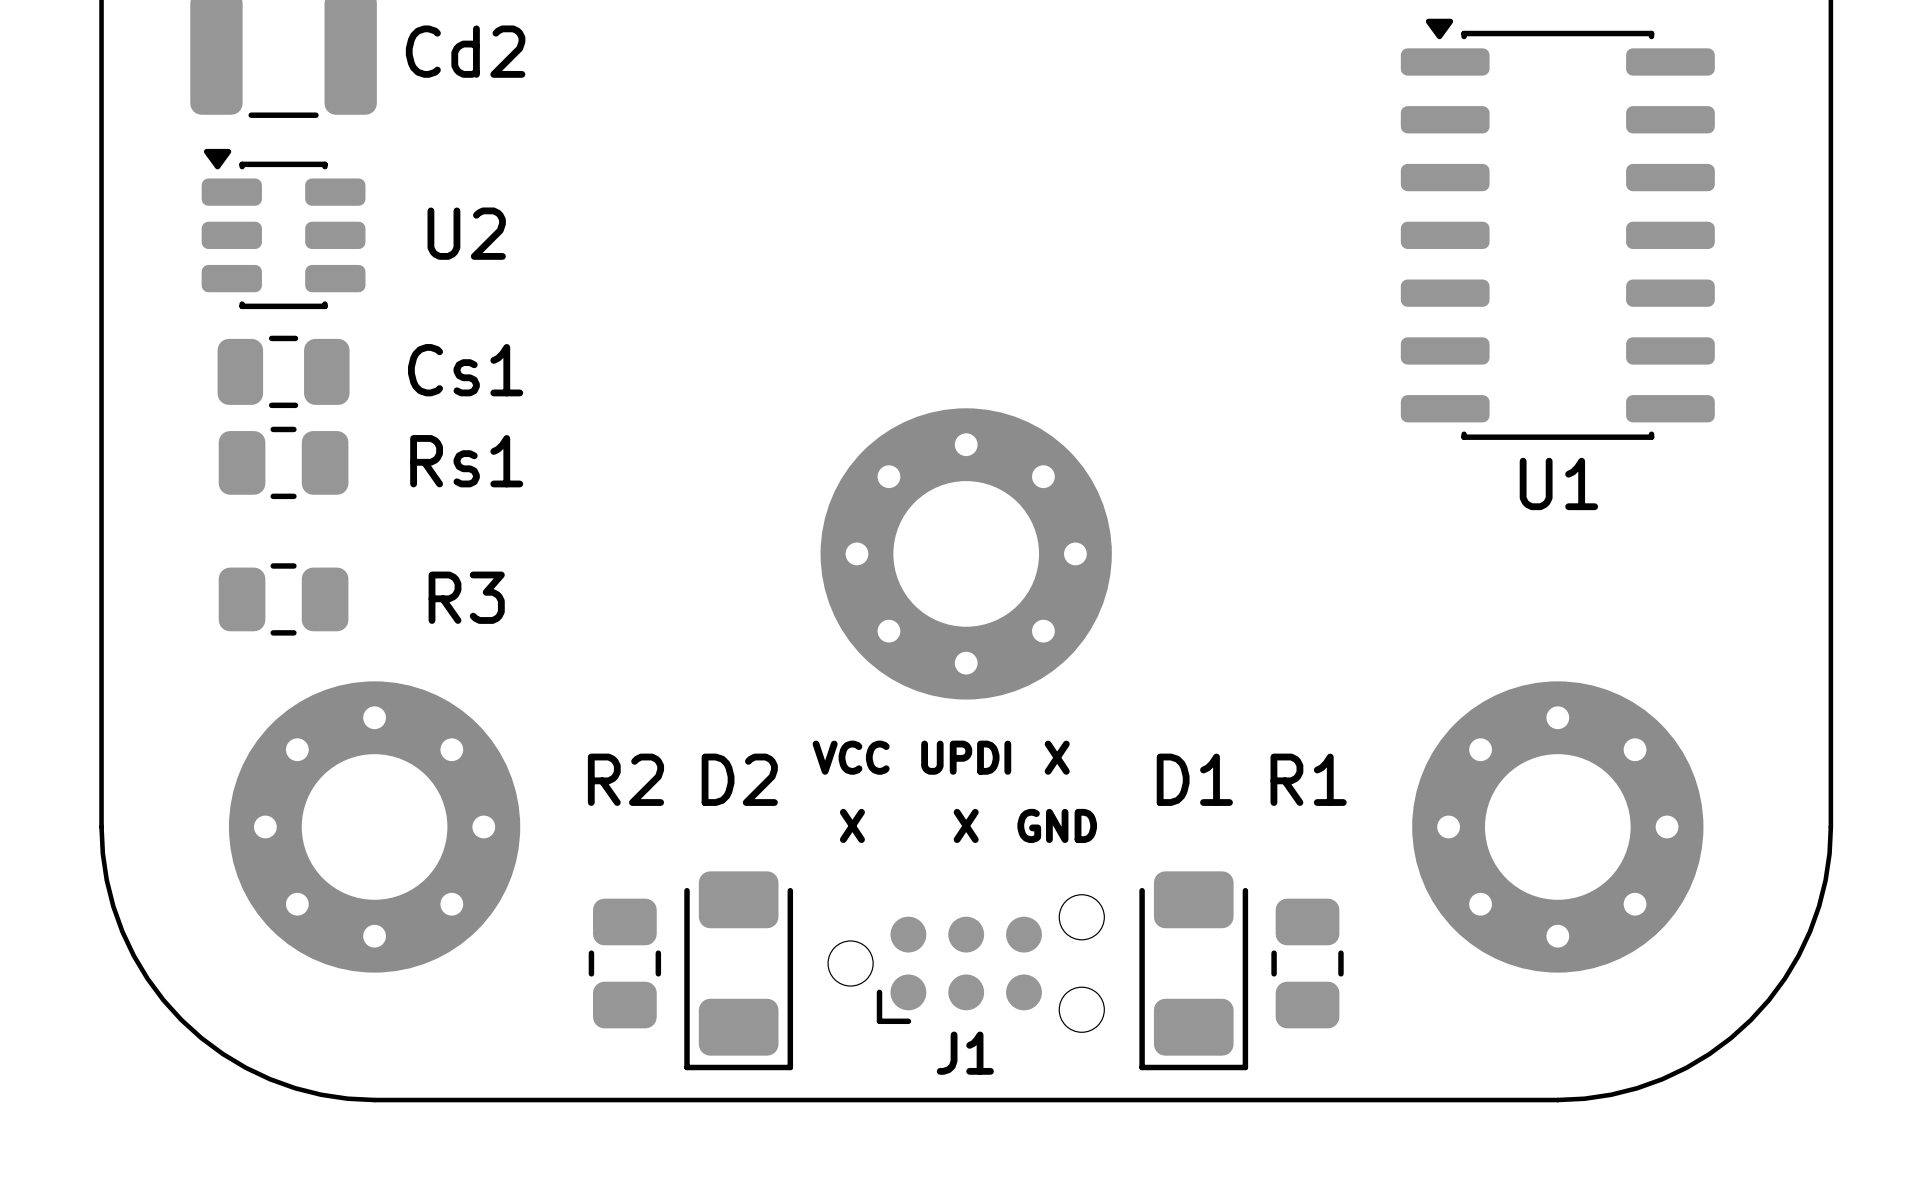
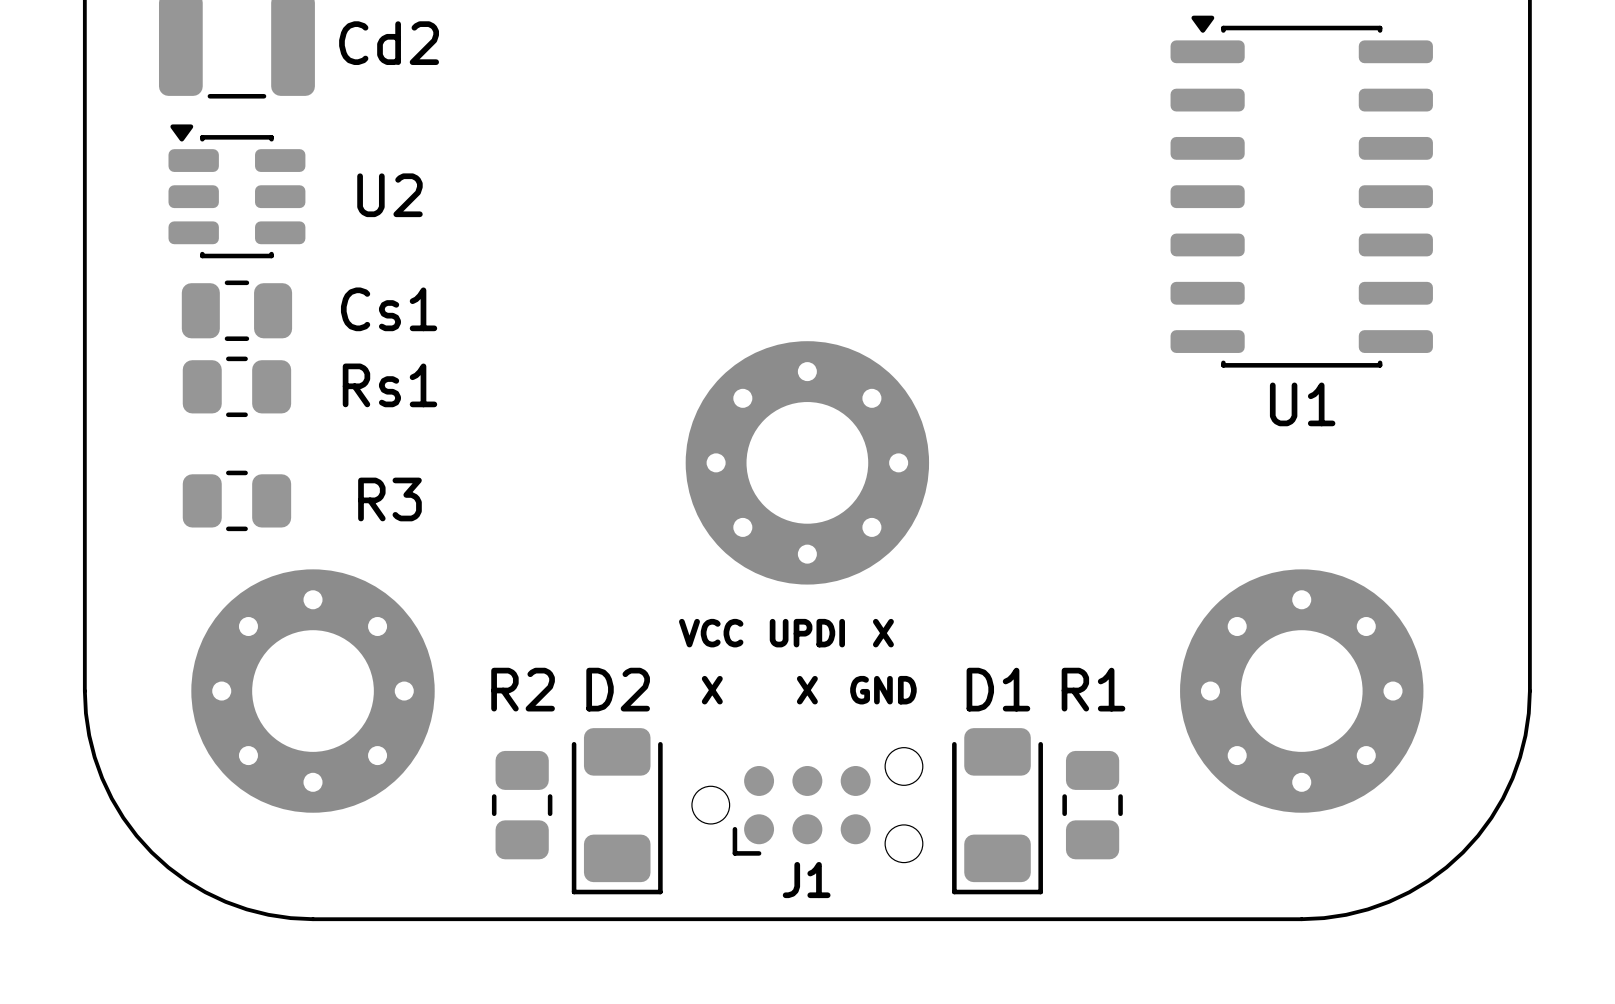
R2 name position: R2 (625, 779) -> R2 (523, 689)
D2 name position: D2 (739, 779) -> D2 (618, 689)
D1 name position: D1 (1194, 779) -> D1 (998, 689)
R1 name position: R1 (1308, 779) -> R1 (1093, 689)

